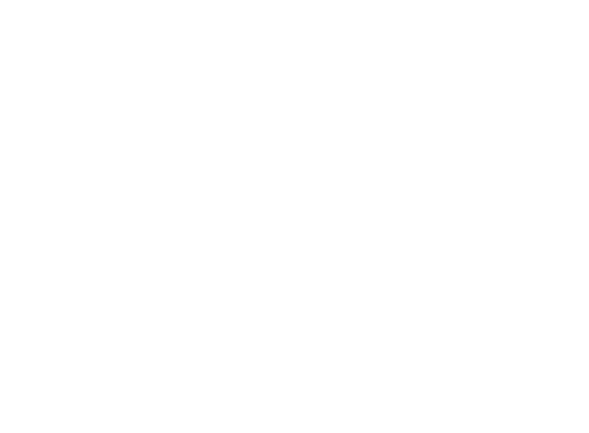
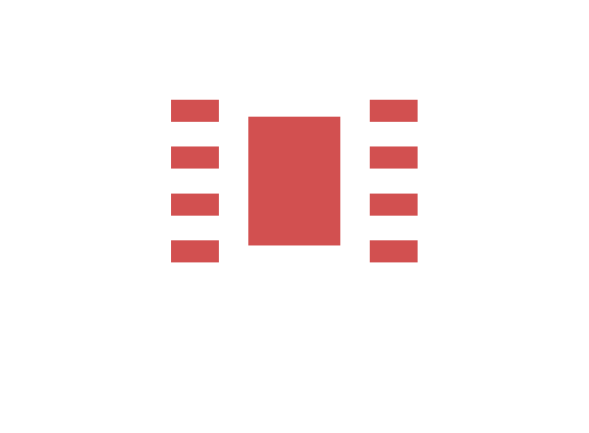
part: none -> (294, 181)

